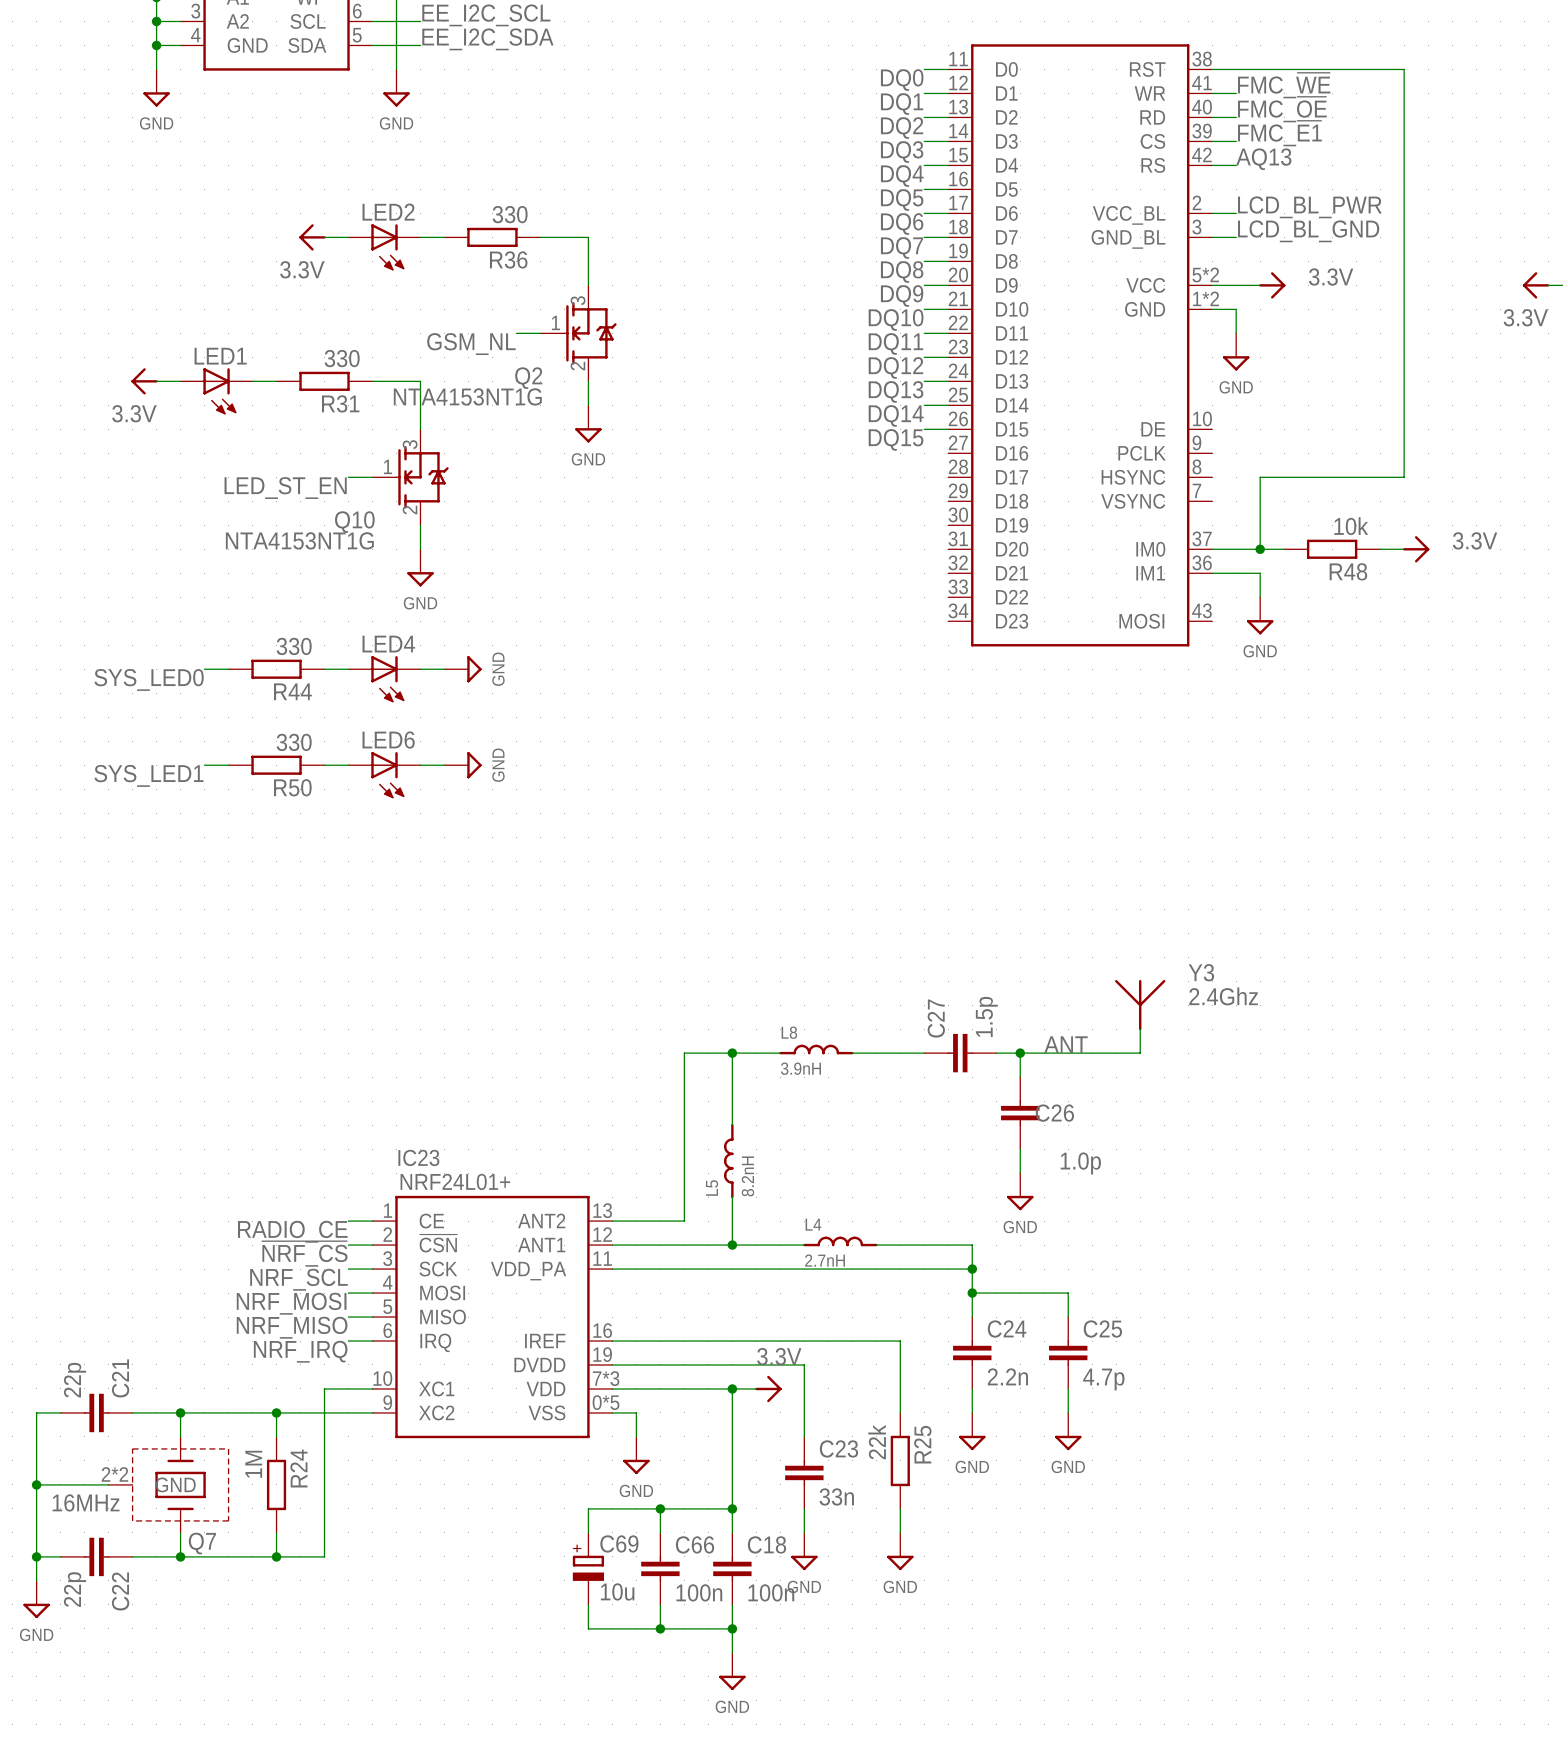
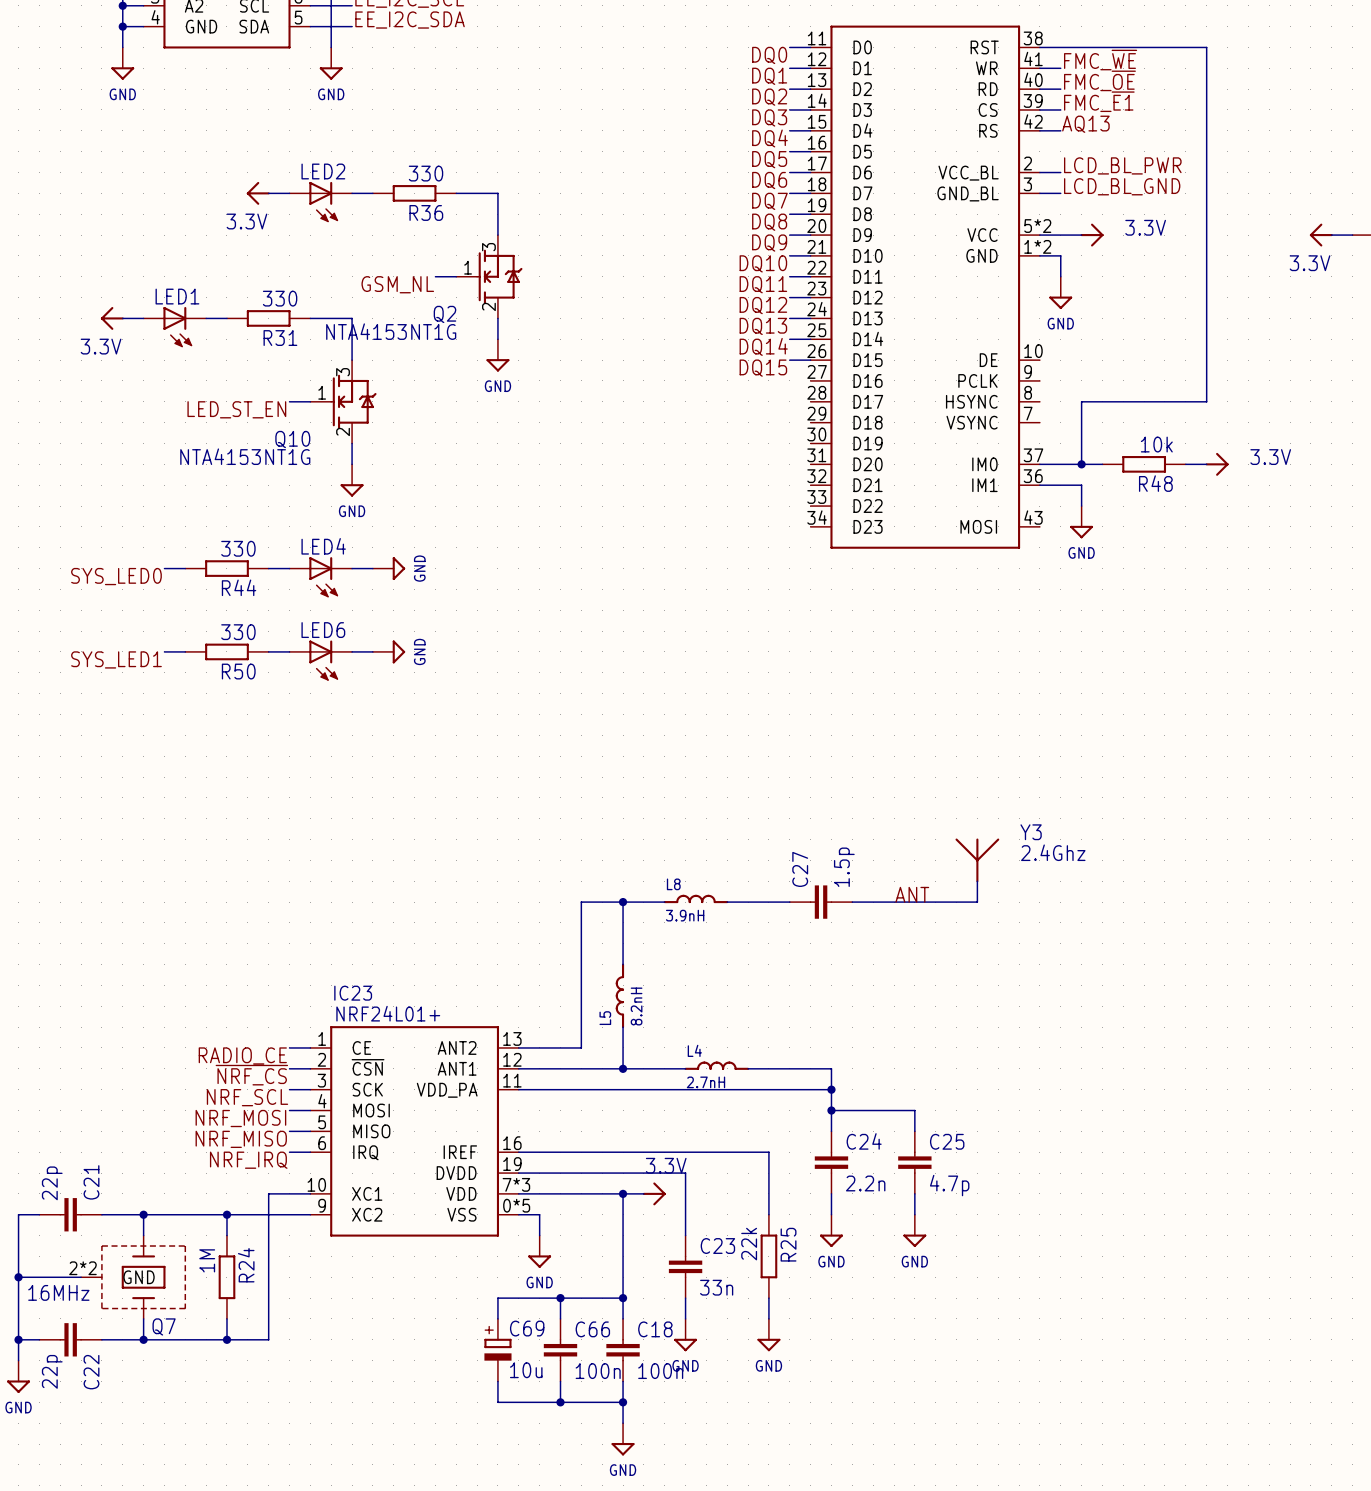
wire: (1020, 1053) (1020, 1077) -> none
junction: (1020, 1053) -> none
C26: 1.0p (1020, 1113) -> none
wire: (1020, 1149) (1020, 1173) -> none
power symbol: GND (1020, 1191) -> none

